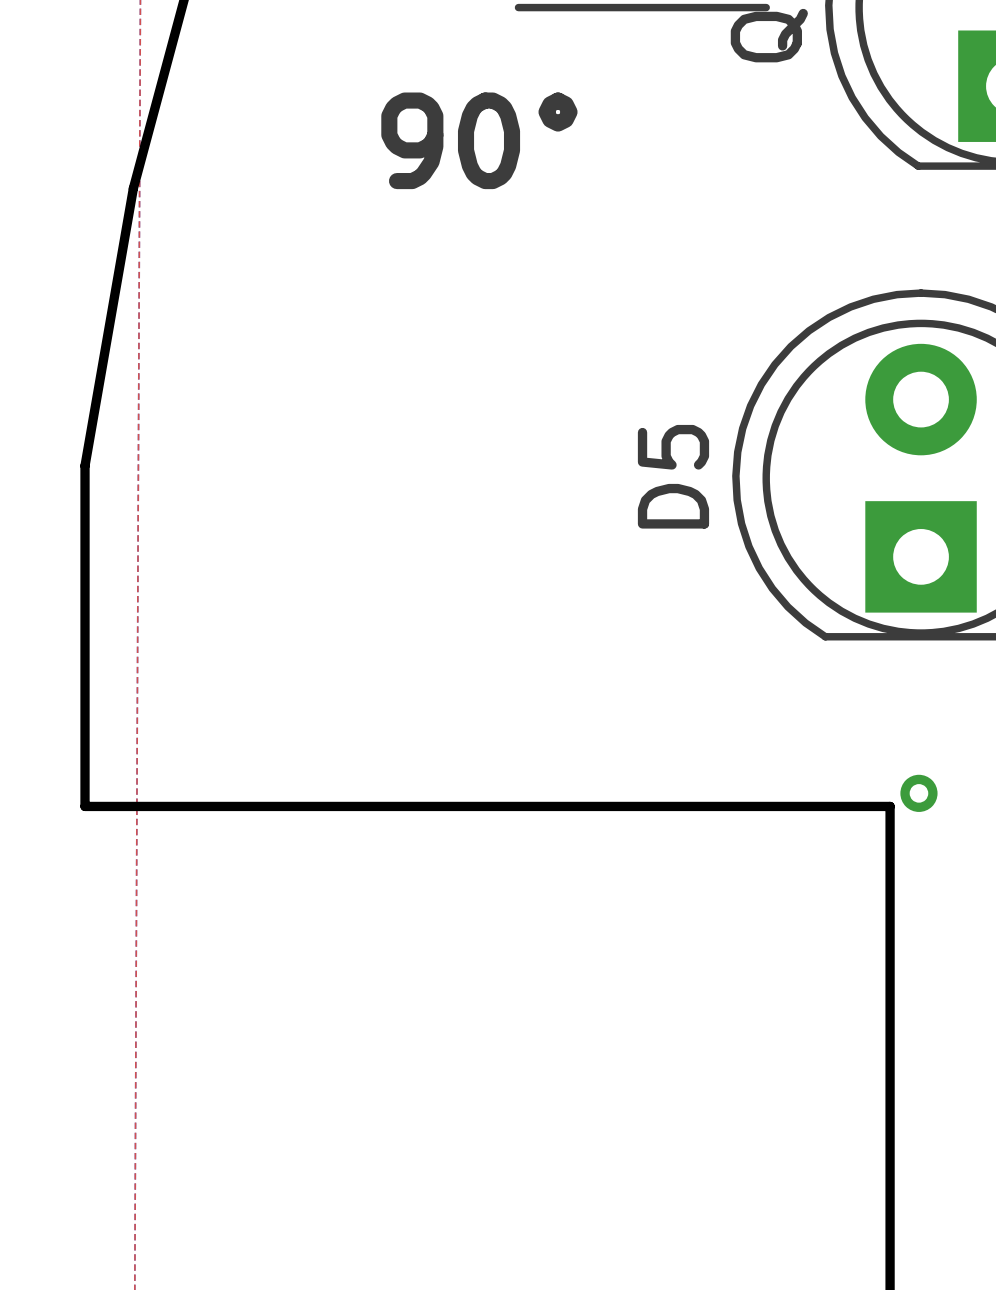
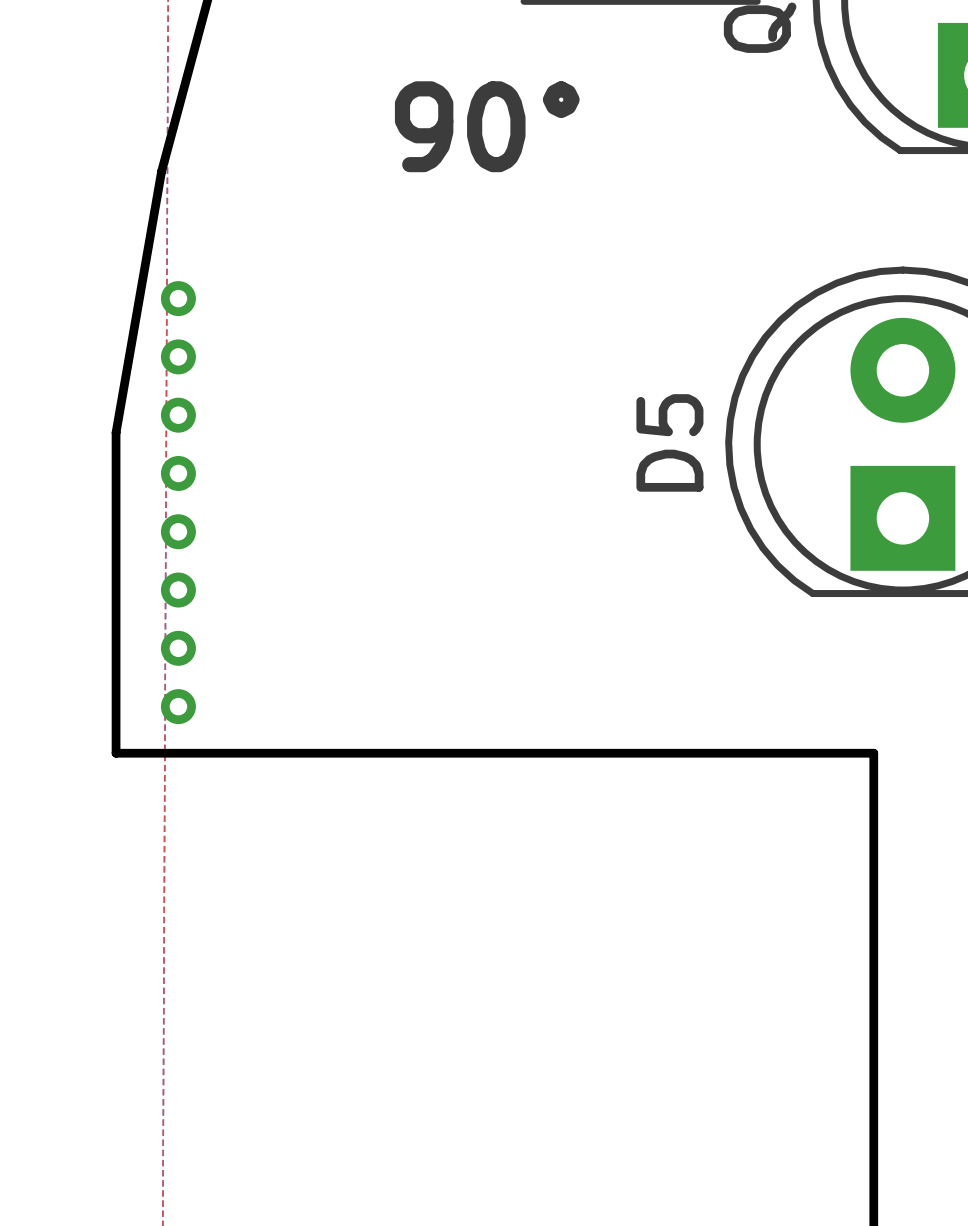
via: none -> (178, 298)
via: none -> (178, 356)
via: none -> (178, 415)
via: none -> (178, 473)
via: none -> (178, 531)
via: none -> (178, 590)
via: none -> (178, 648)
via: none -> (178, 706)
via: (918, 793) -> none

